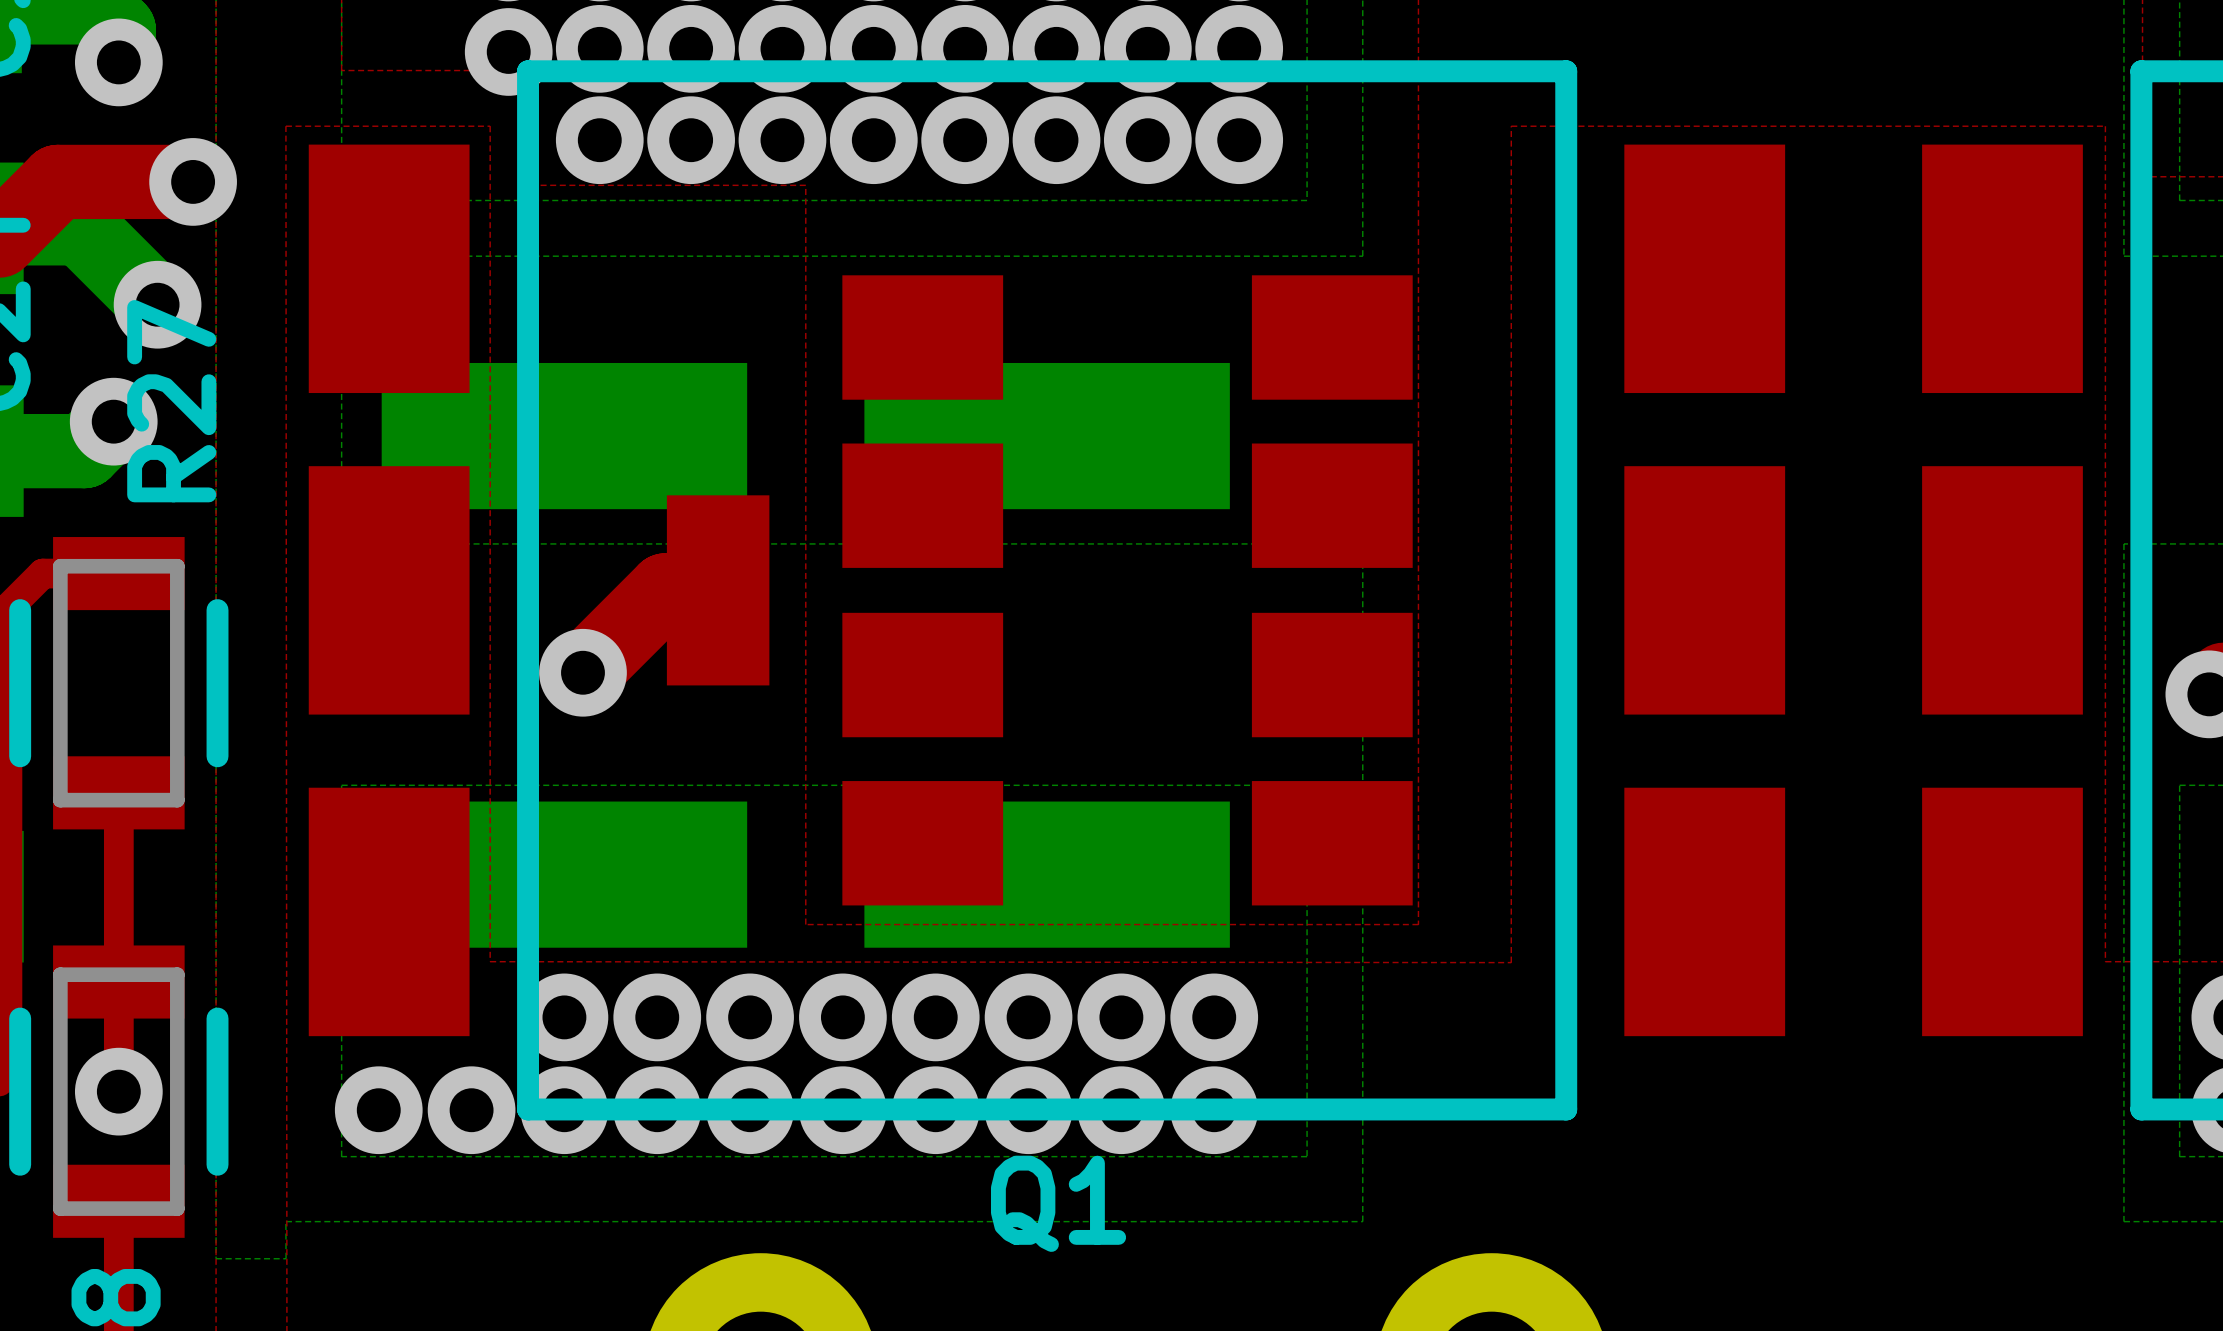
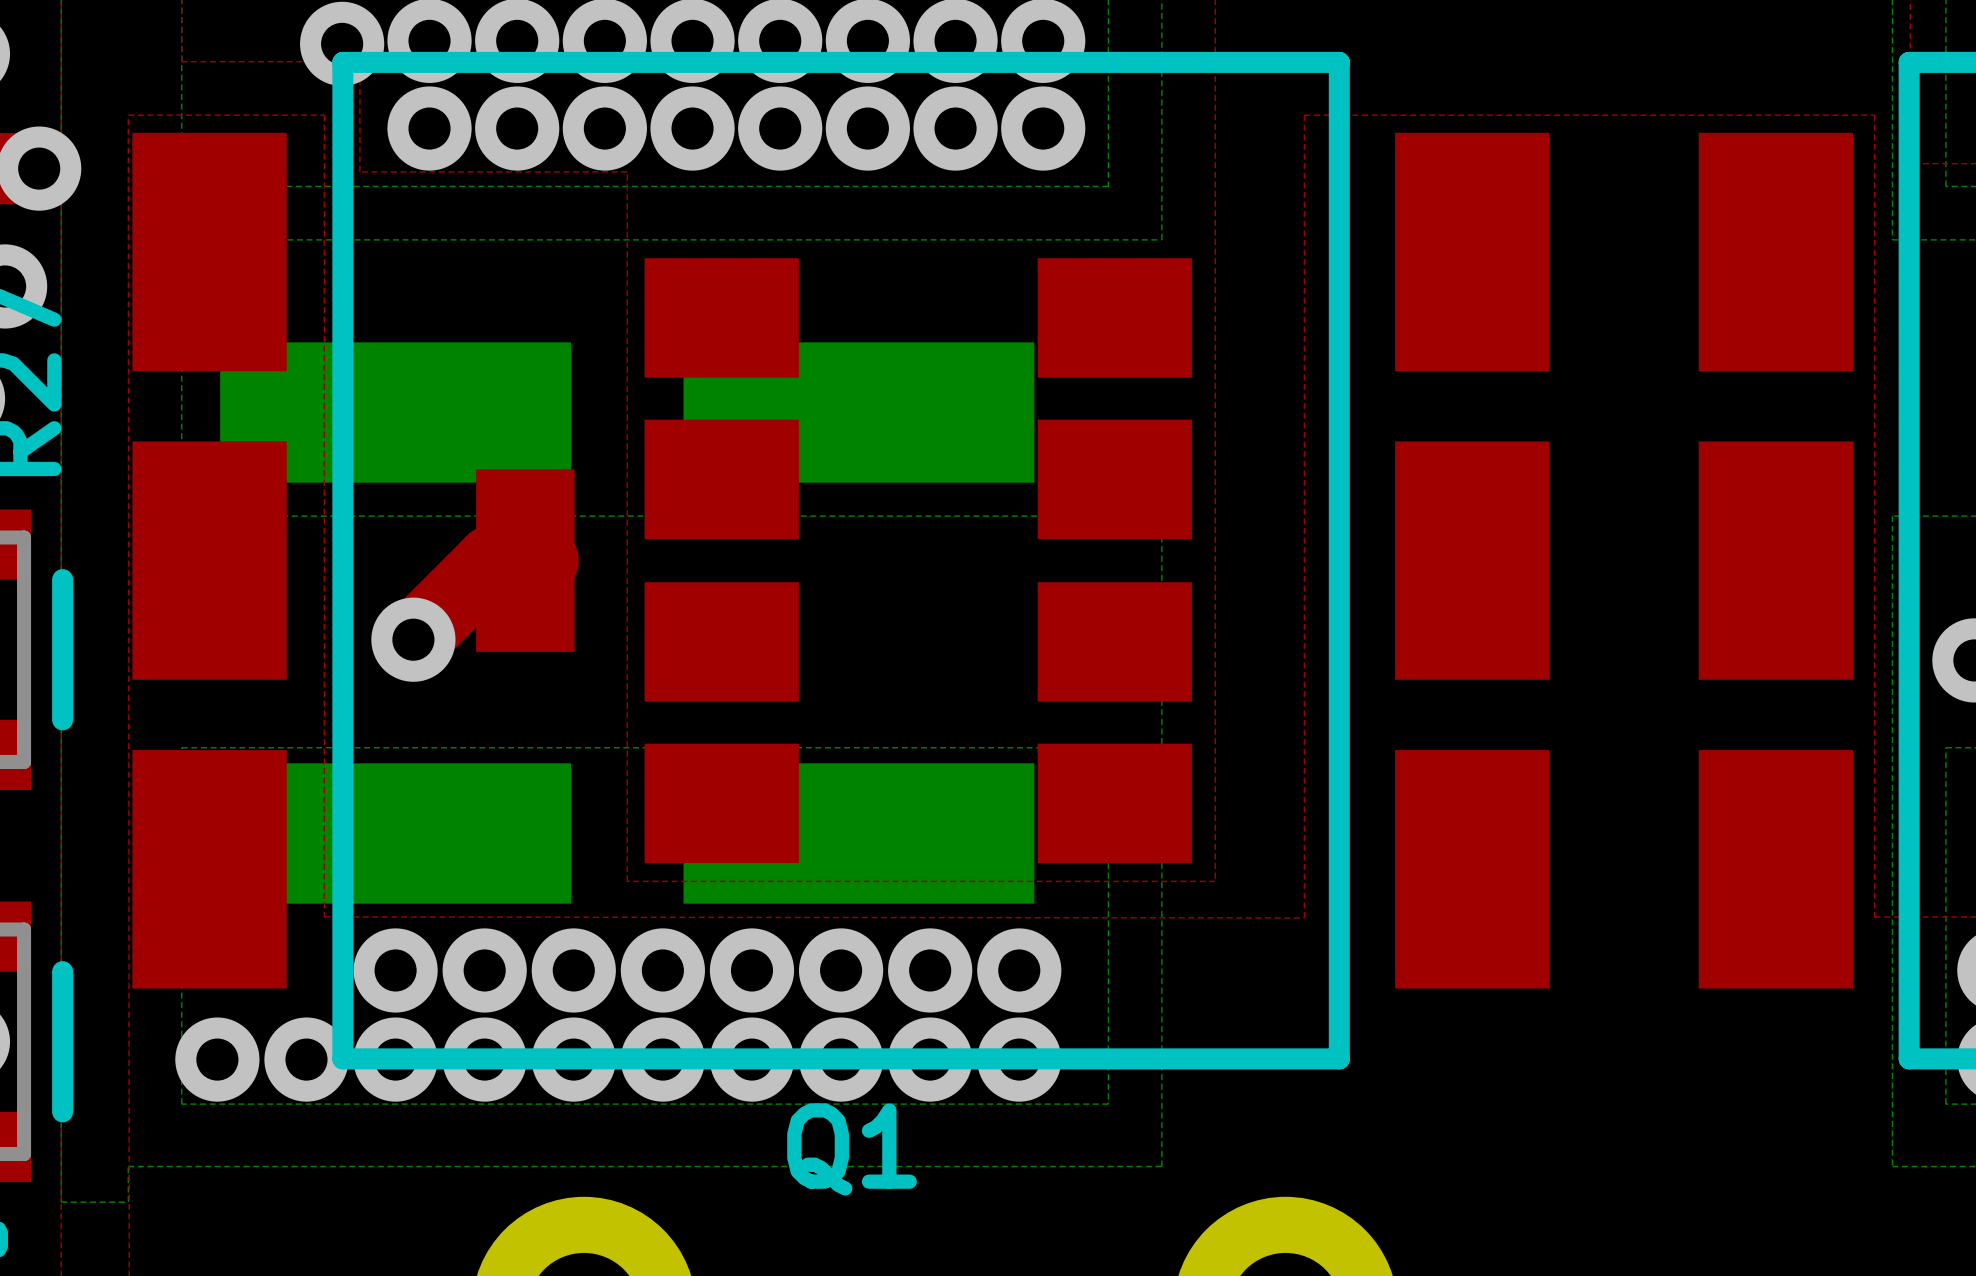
Q1 position: (1046, 590) -> (840, 560)

